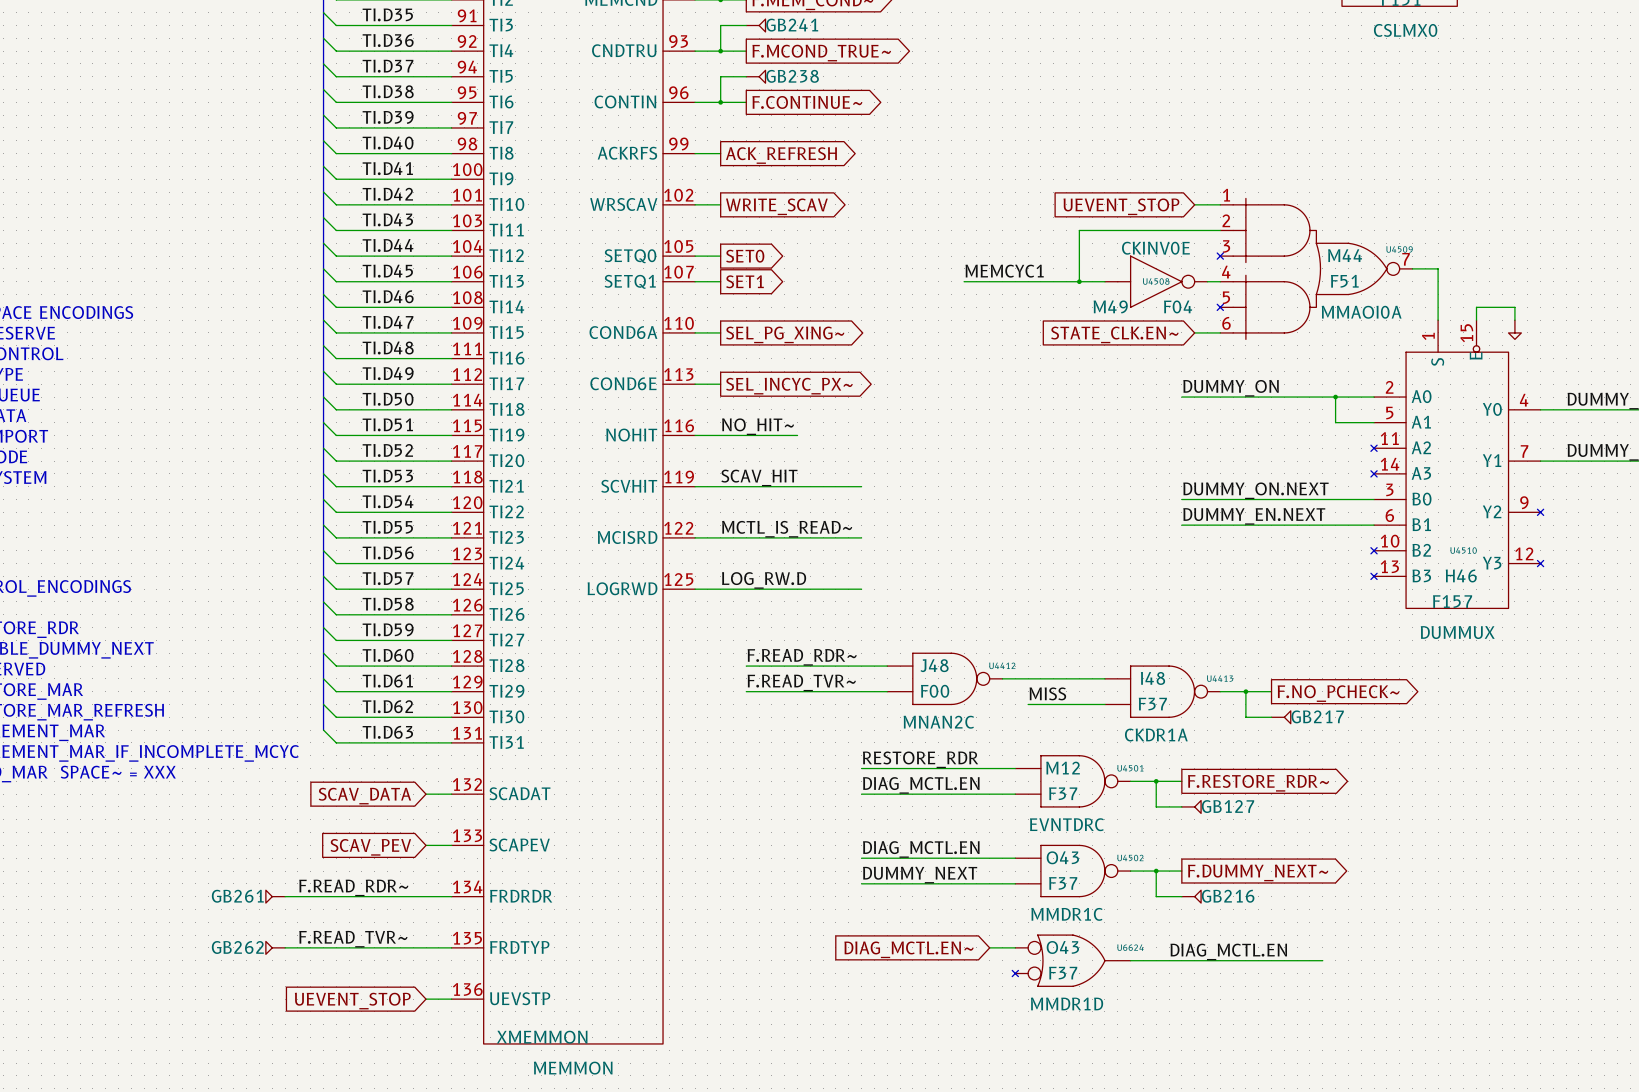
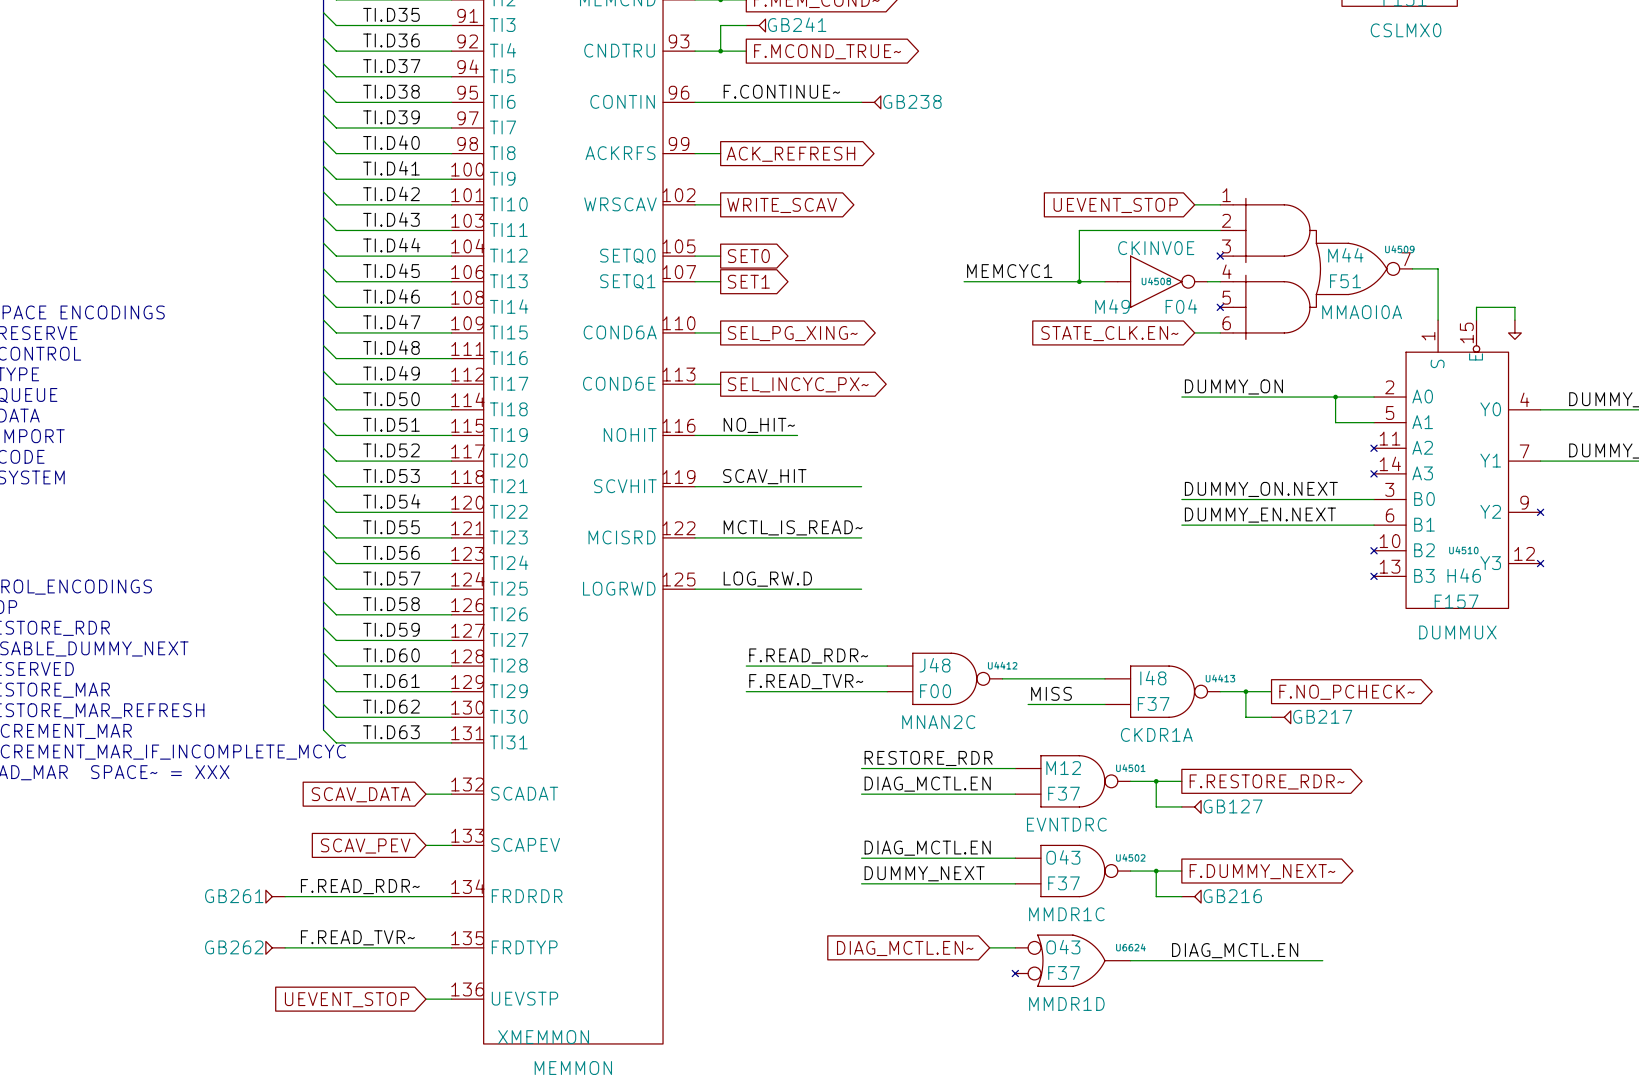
wire: (746, 76) (720, 76) (720, 102) -> none
GB238 position: (756, 76) -> (871, 102)
label: none -> F.CONTINUE~ (781, 91)
junction: (720, 102) -> none
wire: none -> (746, 102) (861, 102)
global label: F.CONTINUE~ (807, 102) -> none

